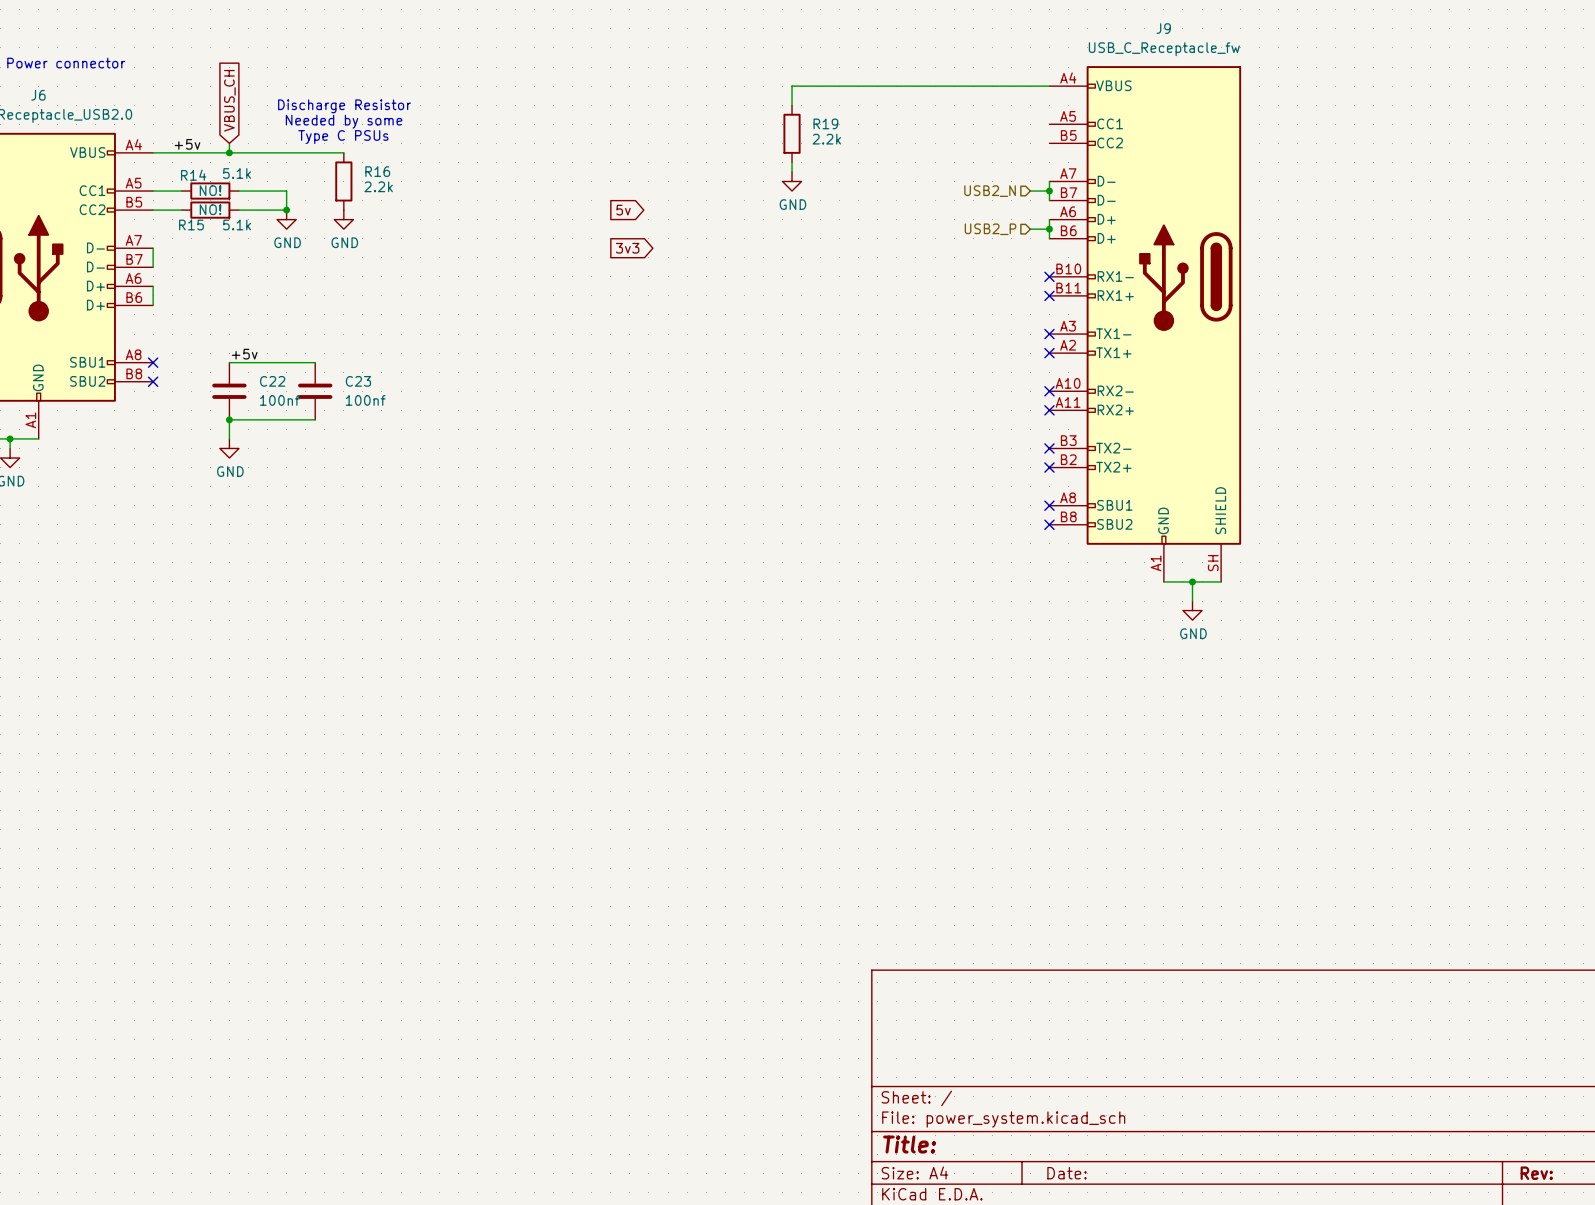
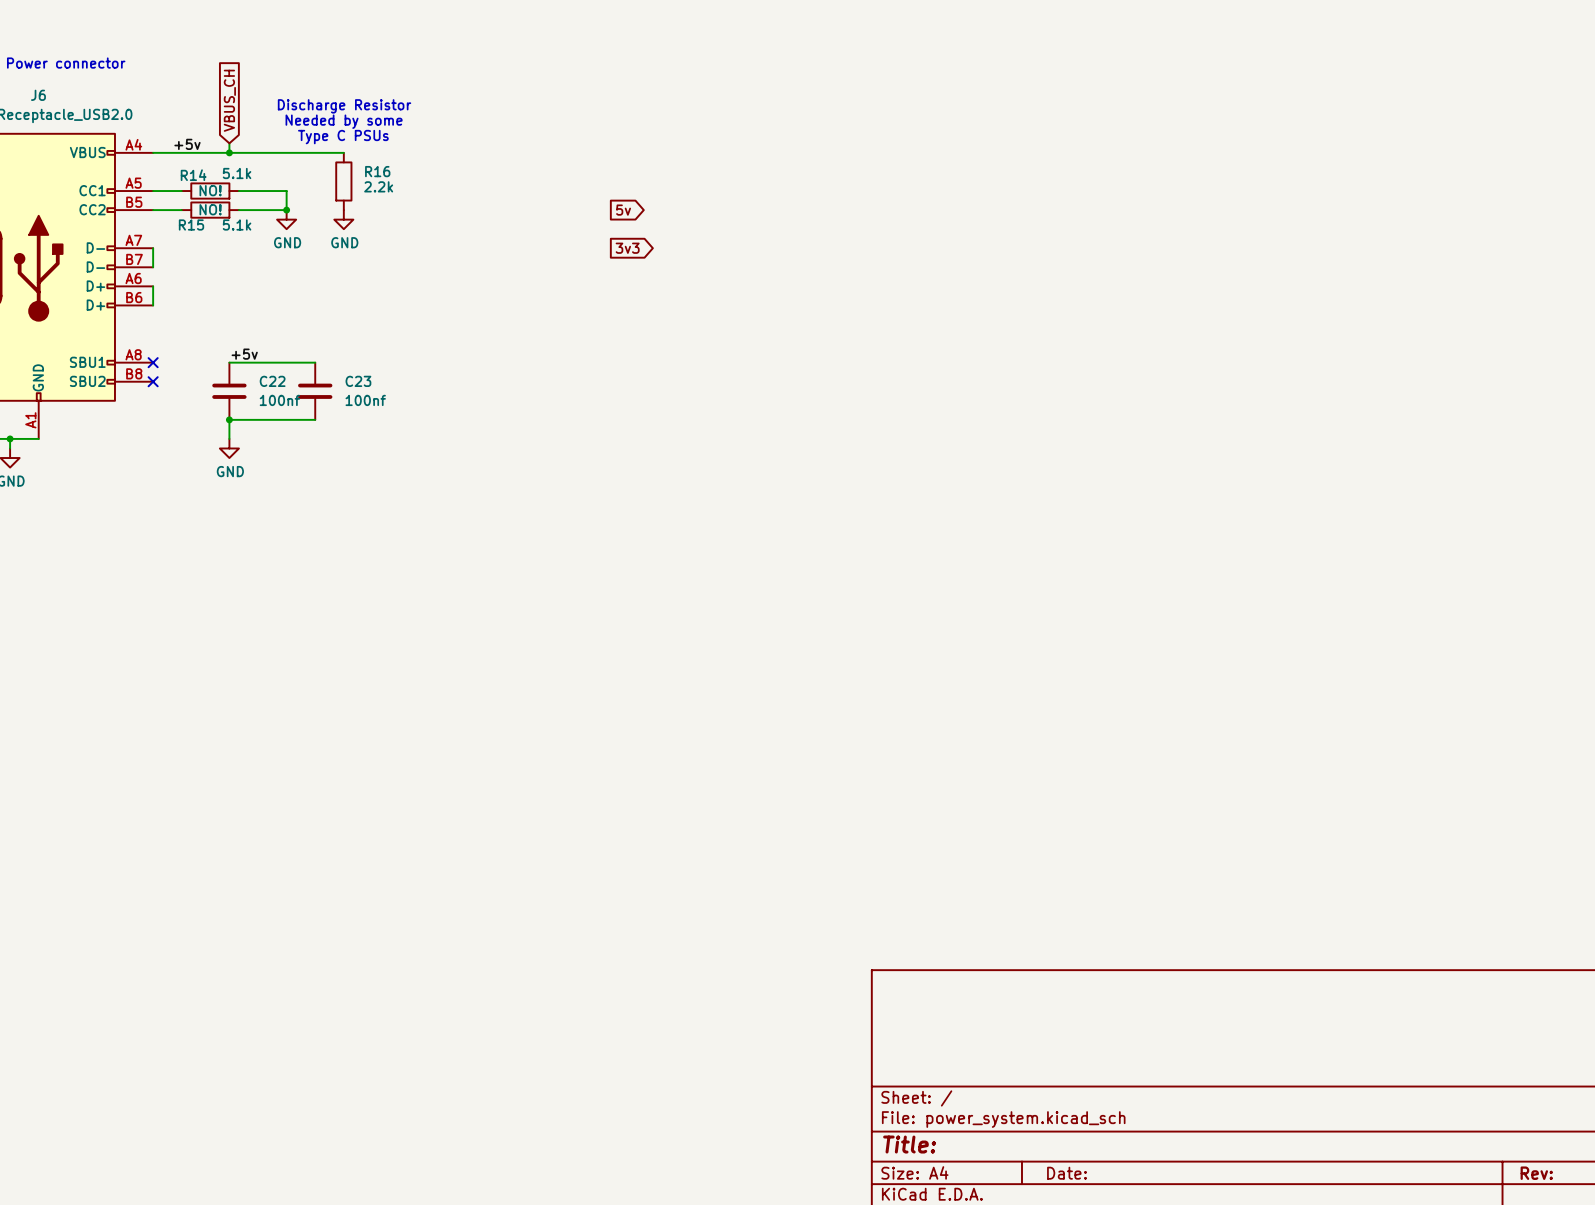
wire: (1049, 86) (792, 86) (792, 105) -> none
R19: 2.2k (792, 133) -> none
wire: (792, 162) (792, 171) -> none
power symbol: GND (792, 181) -> none
wire: (1049, 181) (1049, 200) -> none
hierarchical label: USB2_N (990, 191) -> none
wire: (1030, 191) (1049, 191) -> none
junction: (1049, 191) -> none
wire: (1049, 219) (1049, 238) -> none
hierarchical label: USB2_P (990, 229) -> none
wire: (1030, 229) (1049, 229) -> none
junction: (1049, 229) -> none
no-connect mark: (1049, 276) -> none
no-connect mark: (1049, 295) -> none
J9: USB_C_Receptacle_fw (1145, 324) -> none
no-connect mark: (1049, 334) -> none
no-connect mark: (1049, 353) -> none
no-connect mark: (1049, 391) -> none
no-connect mark: (1049, 410) -> none
no-connect mark: (1049, 448) -> none
no-connect mark: (1049, 467) -> none
no-connect mark: (1049, 505) -> none
no-connect mark: (1049, 524) -> none
wire: (1163, 581) (1221, 581) -> none
wire: (1192, 581) (1192, 601) -> none
junction: (1192, 581) -> none
power symbol: GND (1192, 610) -> none

